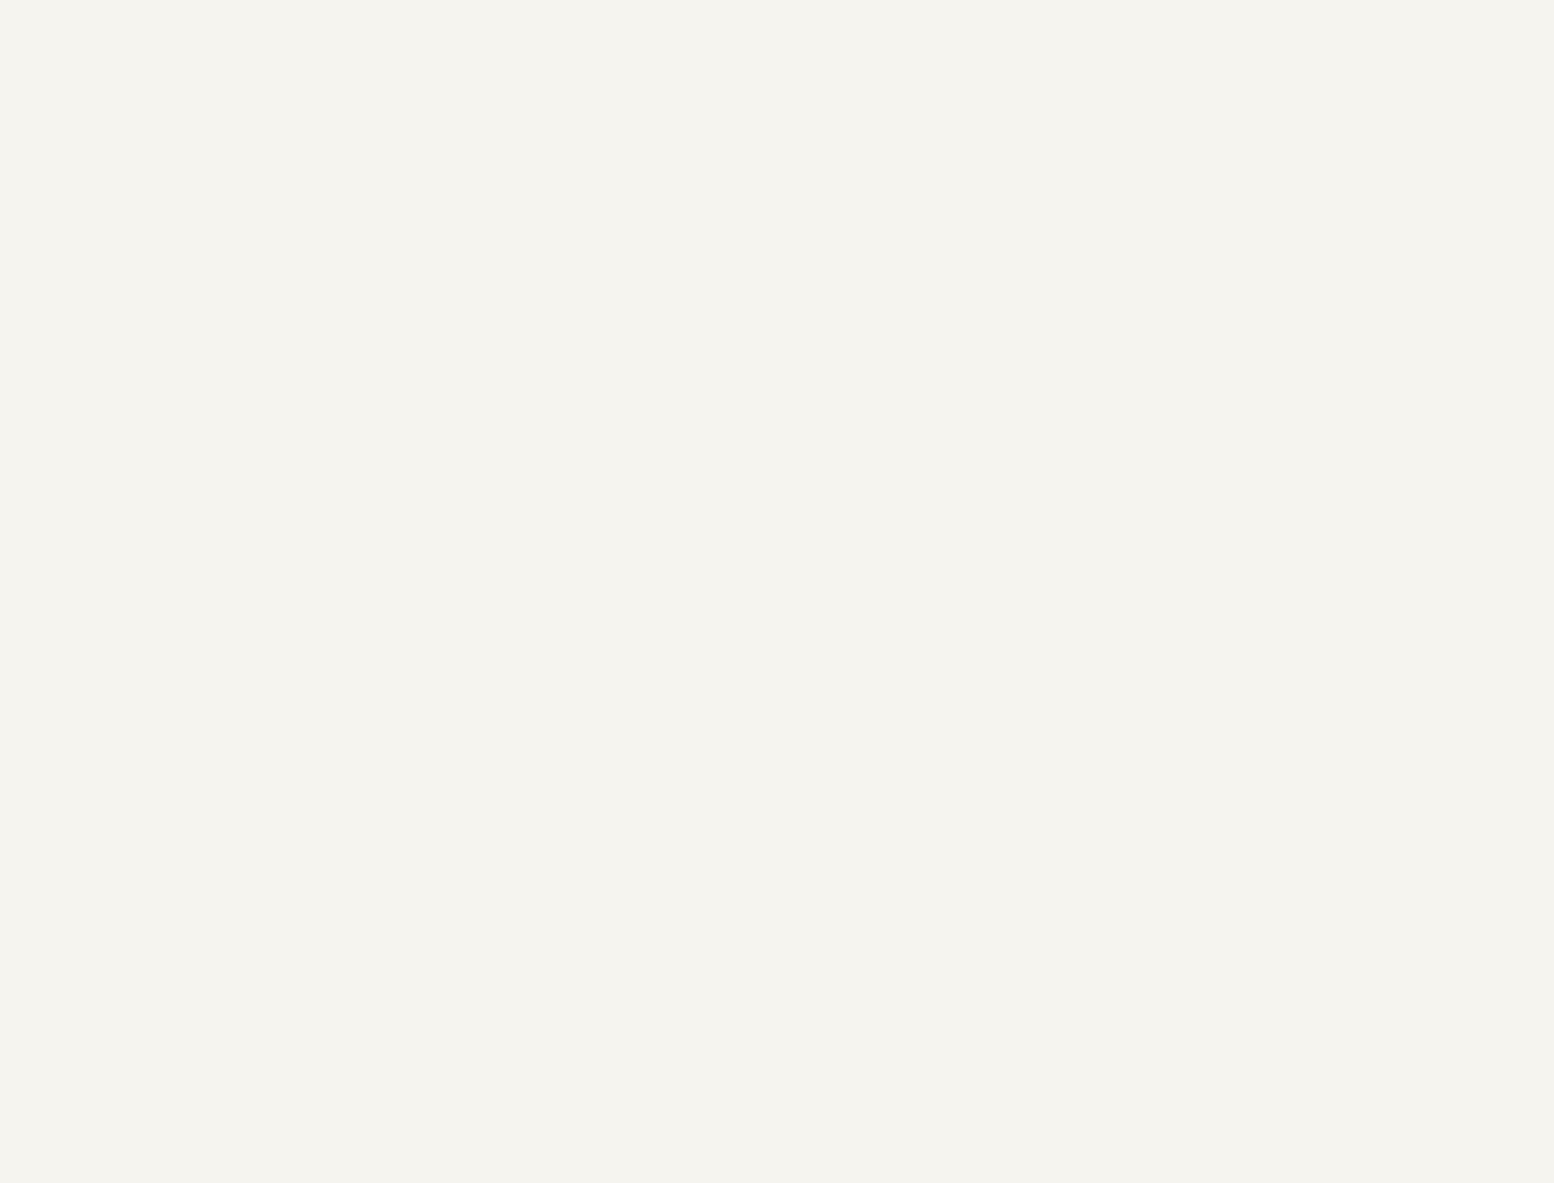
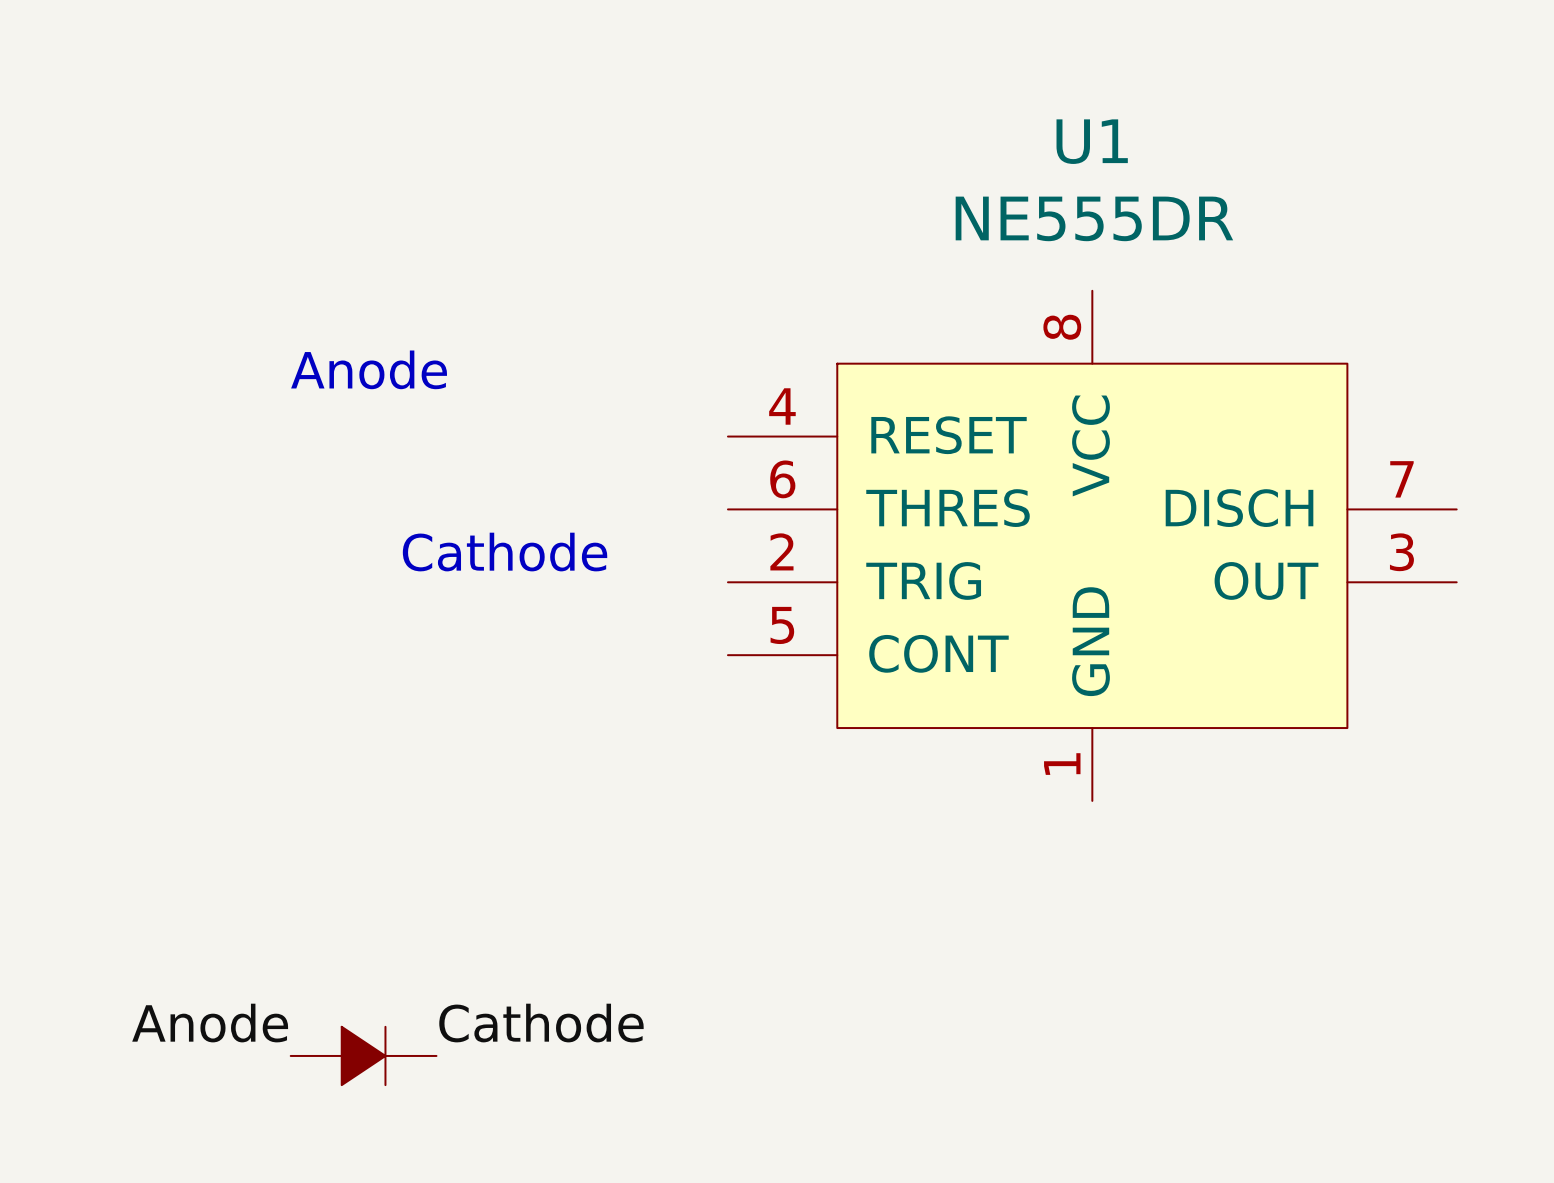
text: none -> Anode (369, 369)
U1: none -> NE555DR (1092, 545)
text: none -> Cathode (505, 552)
label: none -> Anode (210, 1023)
label: none -> Cathode (541, 1023)
part: none -> (363, 1055)

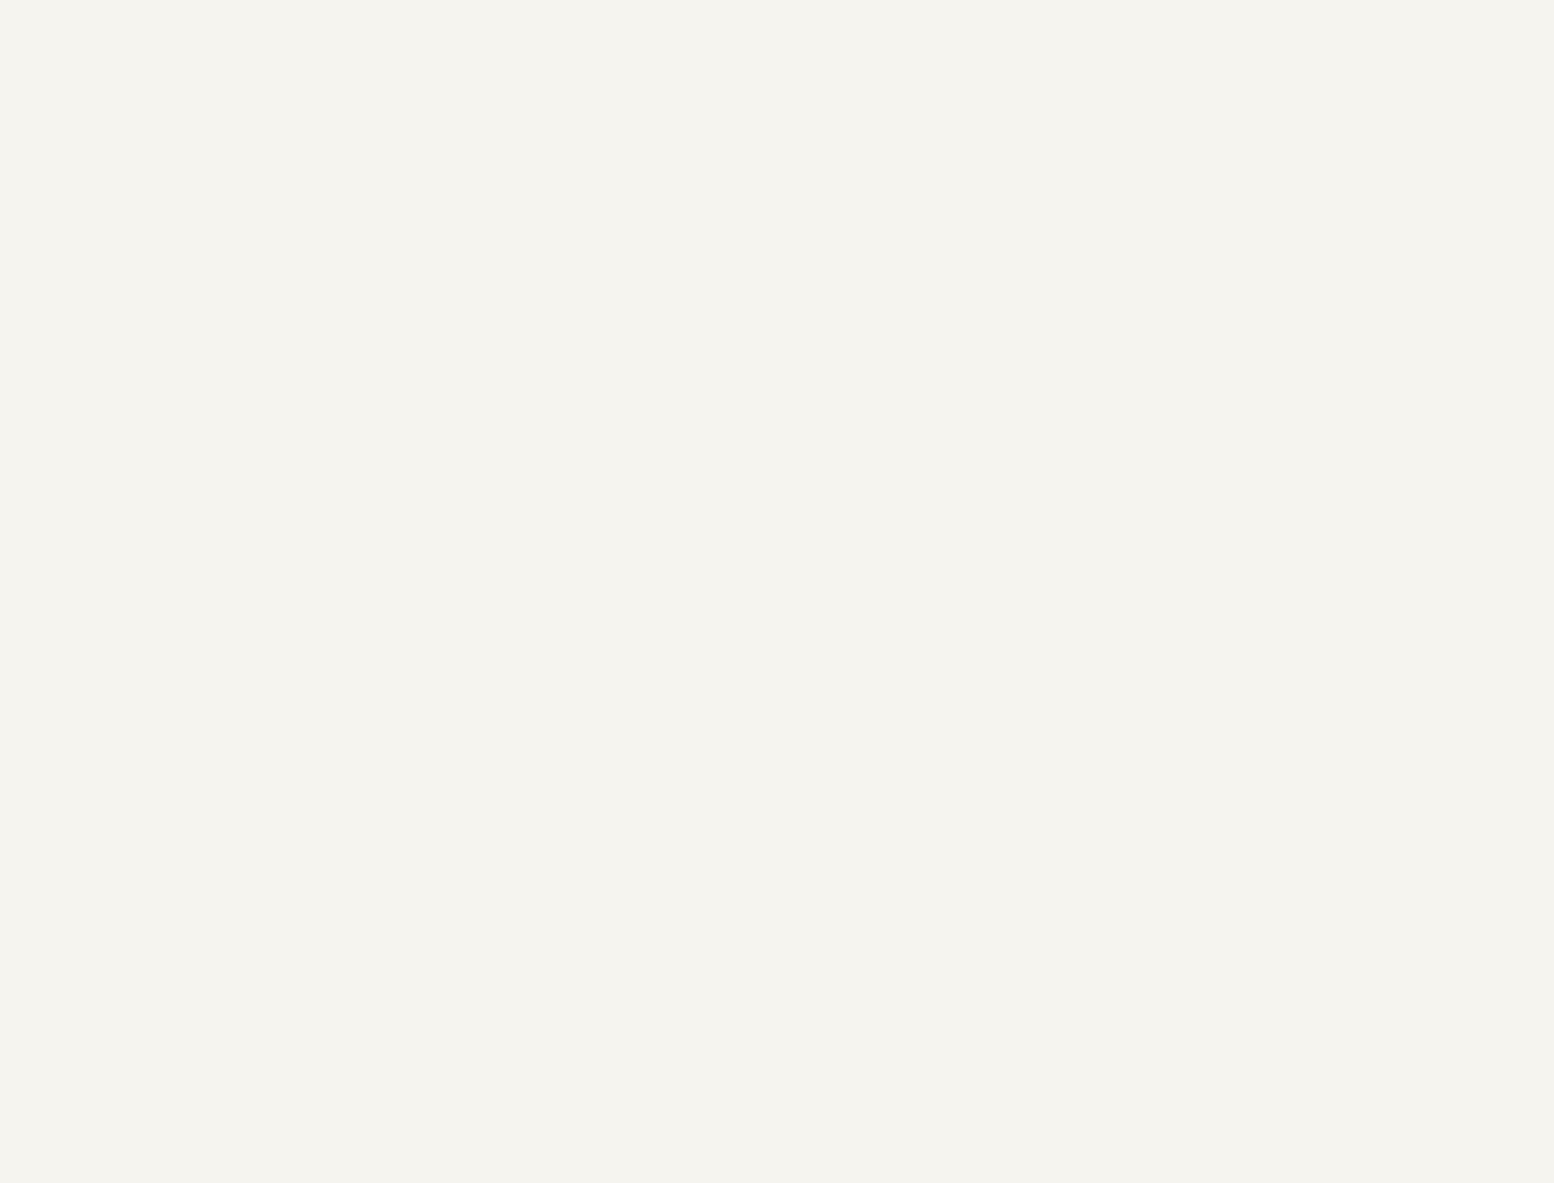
text: Anode (369, 369) -> none
U1: NE555DR (1092, 545) -> none
text: Cathode (505, 552) -> none
label: Anode (210, 1023) -> none
label: Cathode (541, 1023) -> none
part: (363, 1055) -> none

